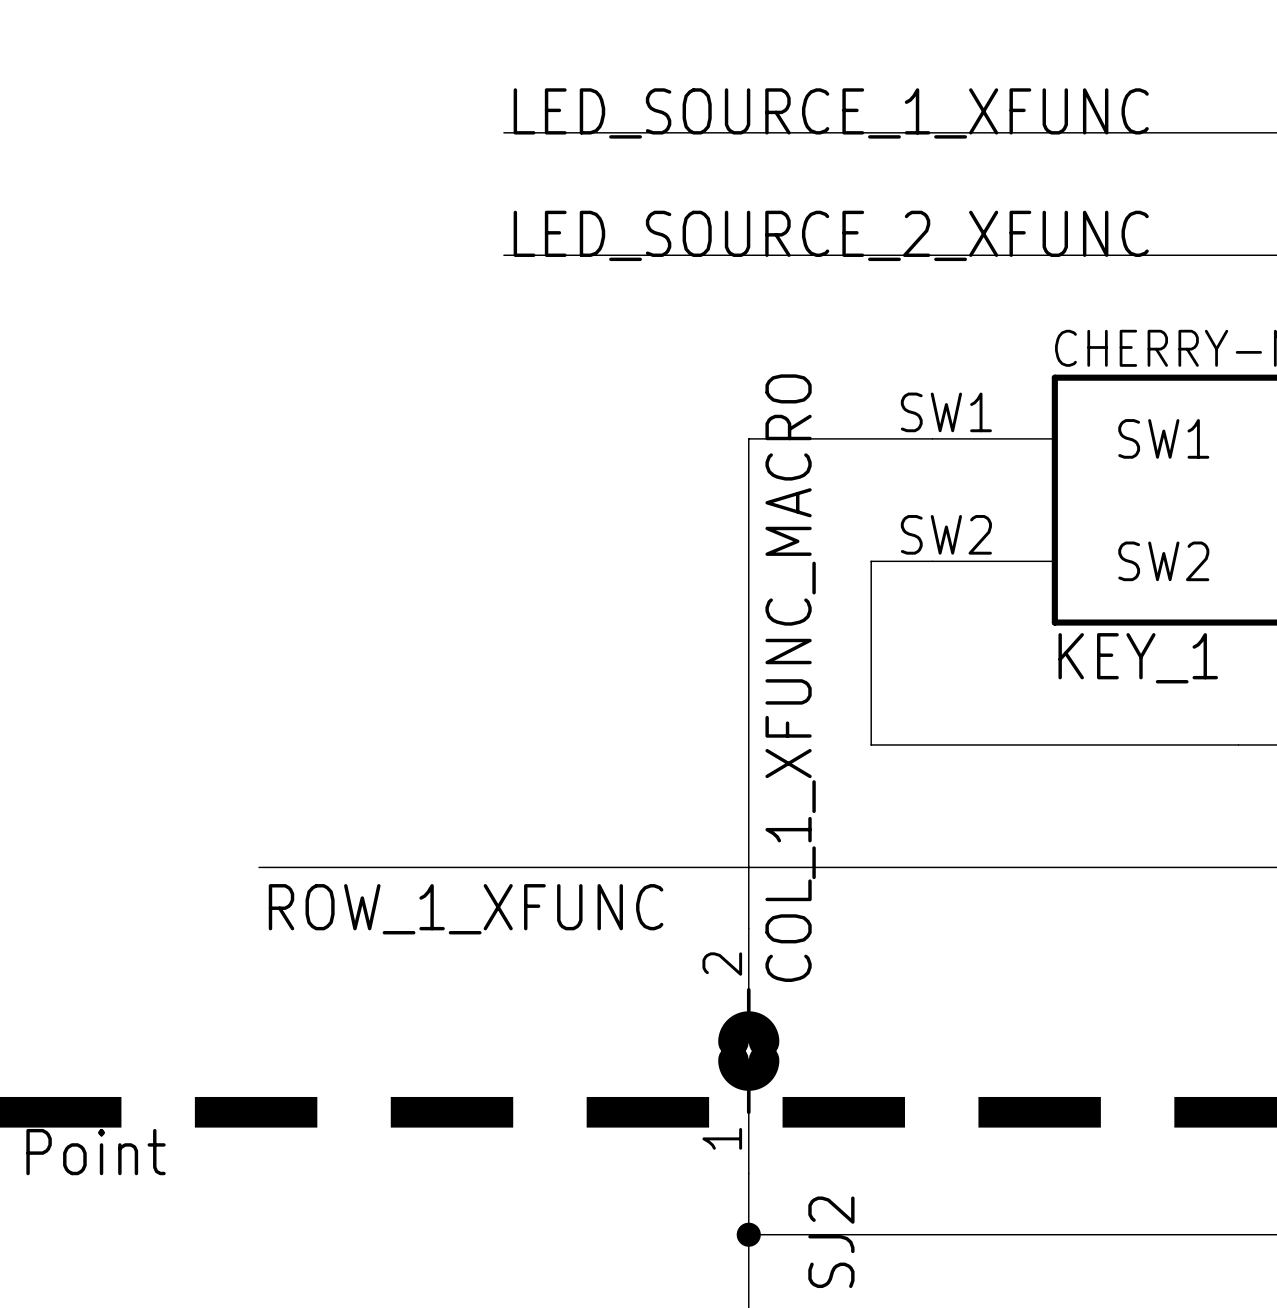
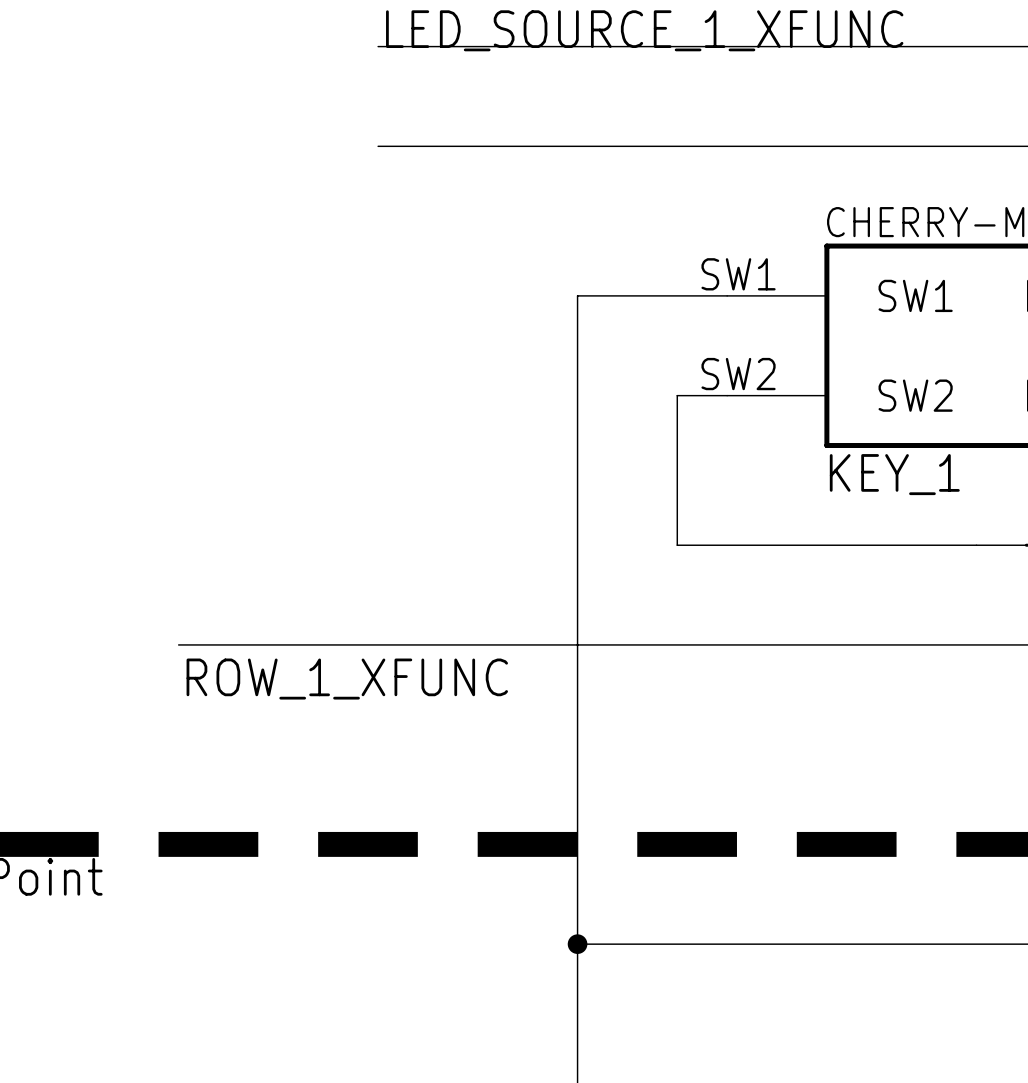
label: LED_SOURCE_2_XFUNC (831, 235) -> none
label: COL_1_XFUNC_MACRO (790, 678) -> none
SJ2: (748, 1051) -> none

